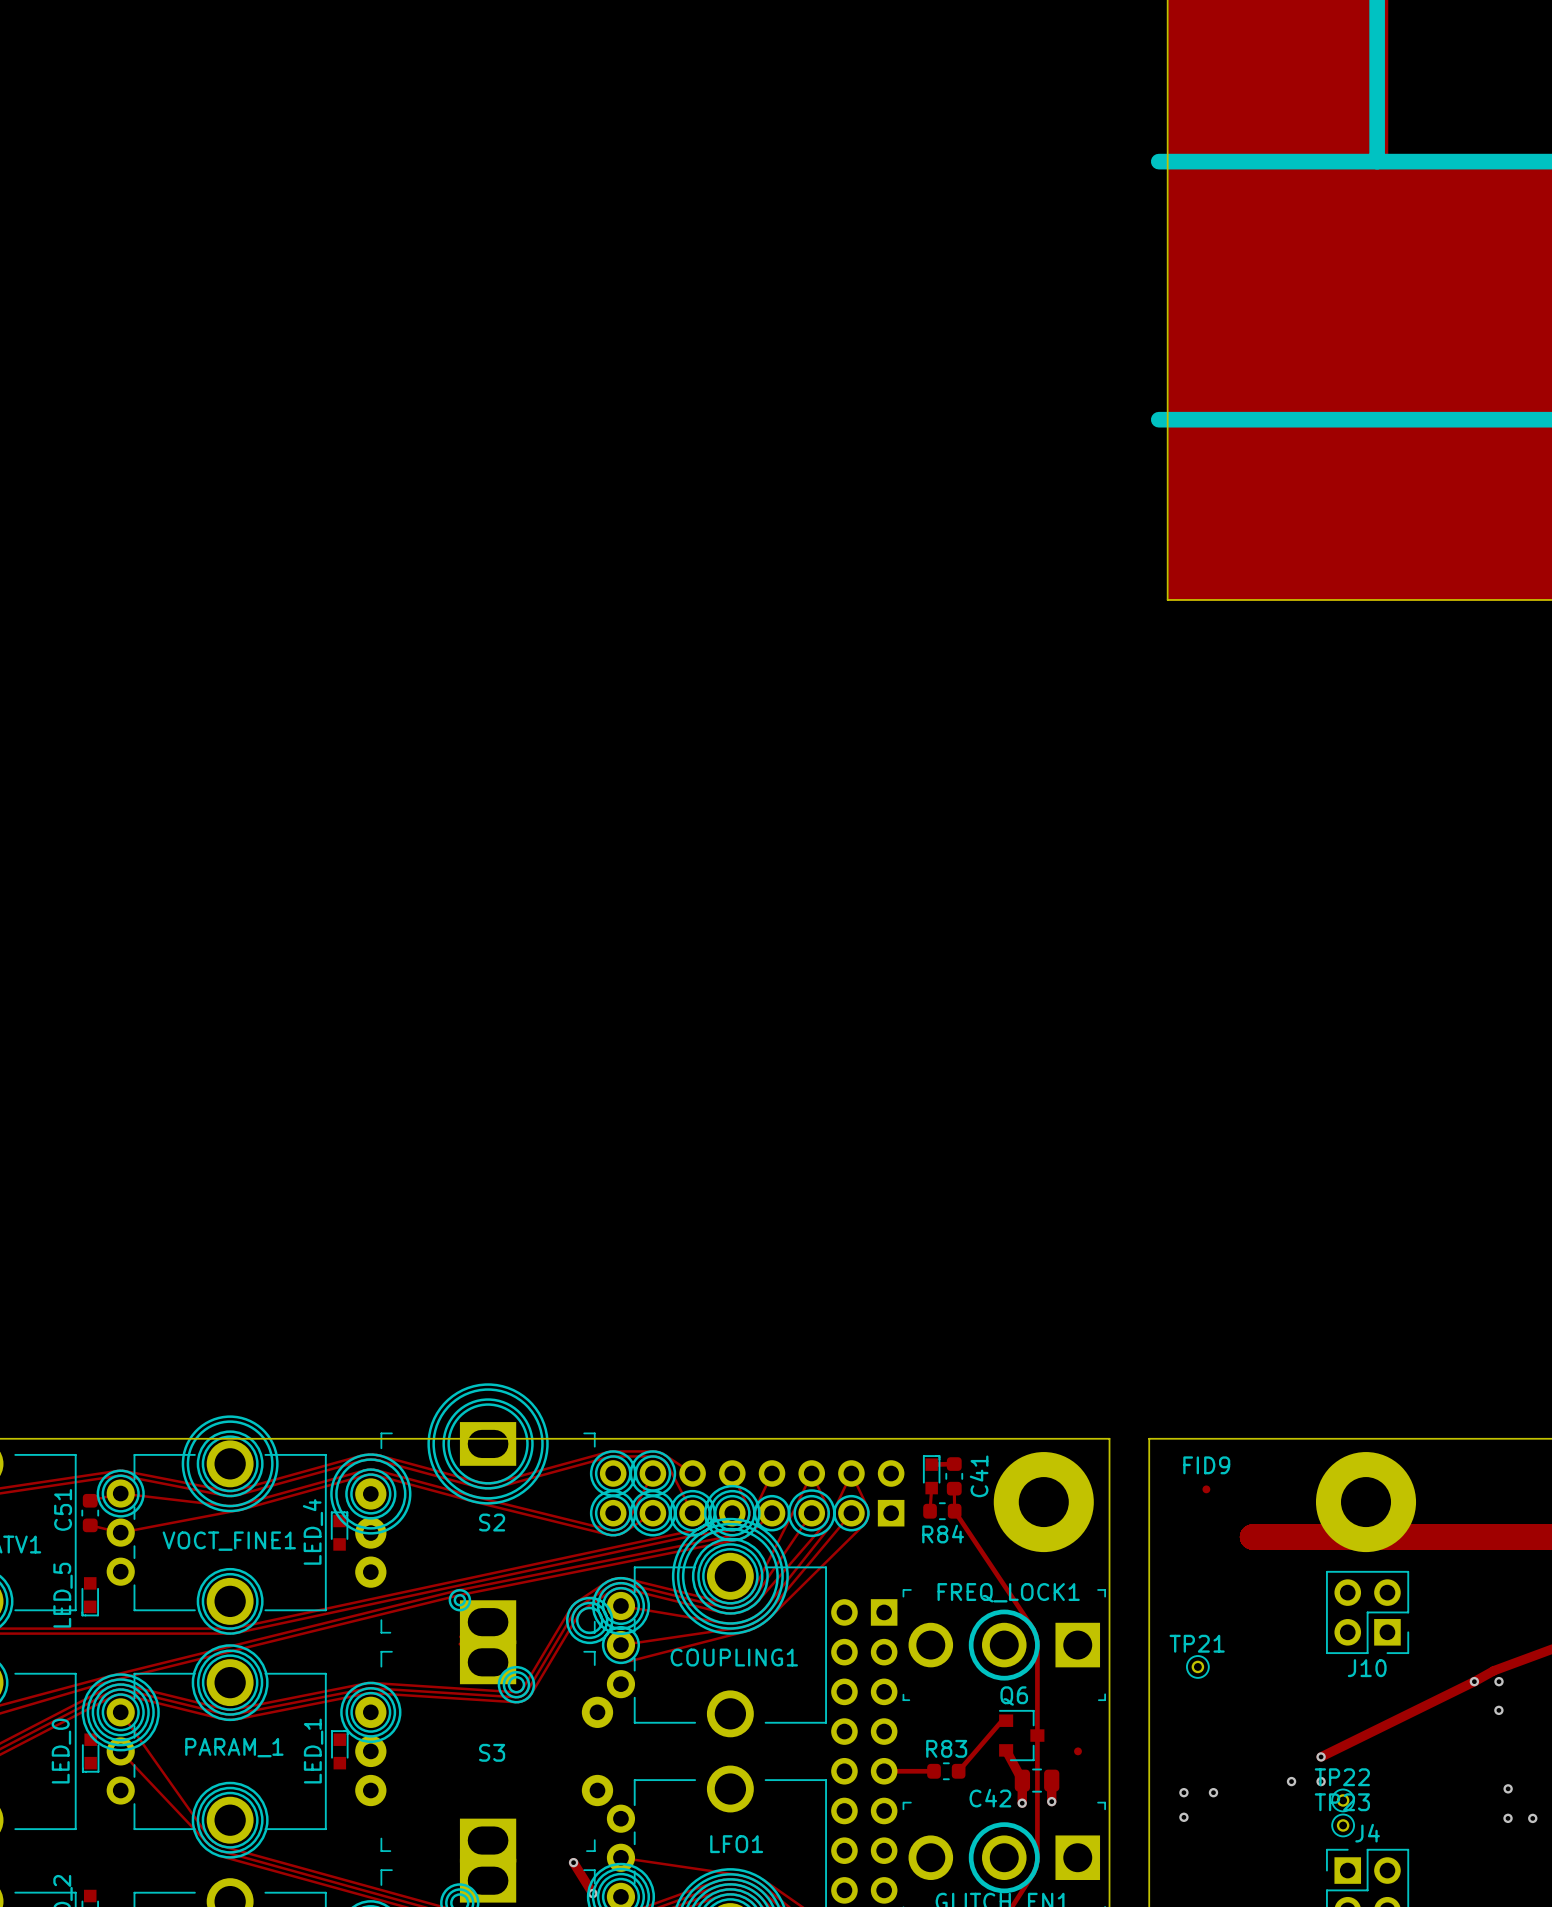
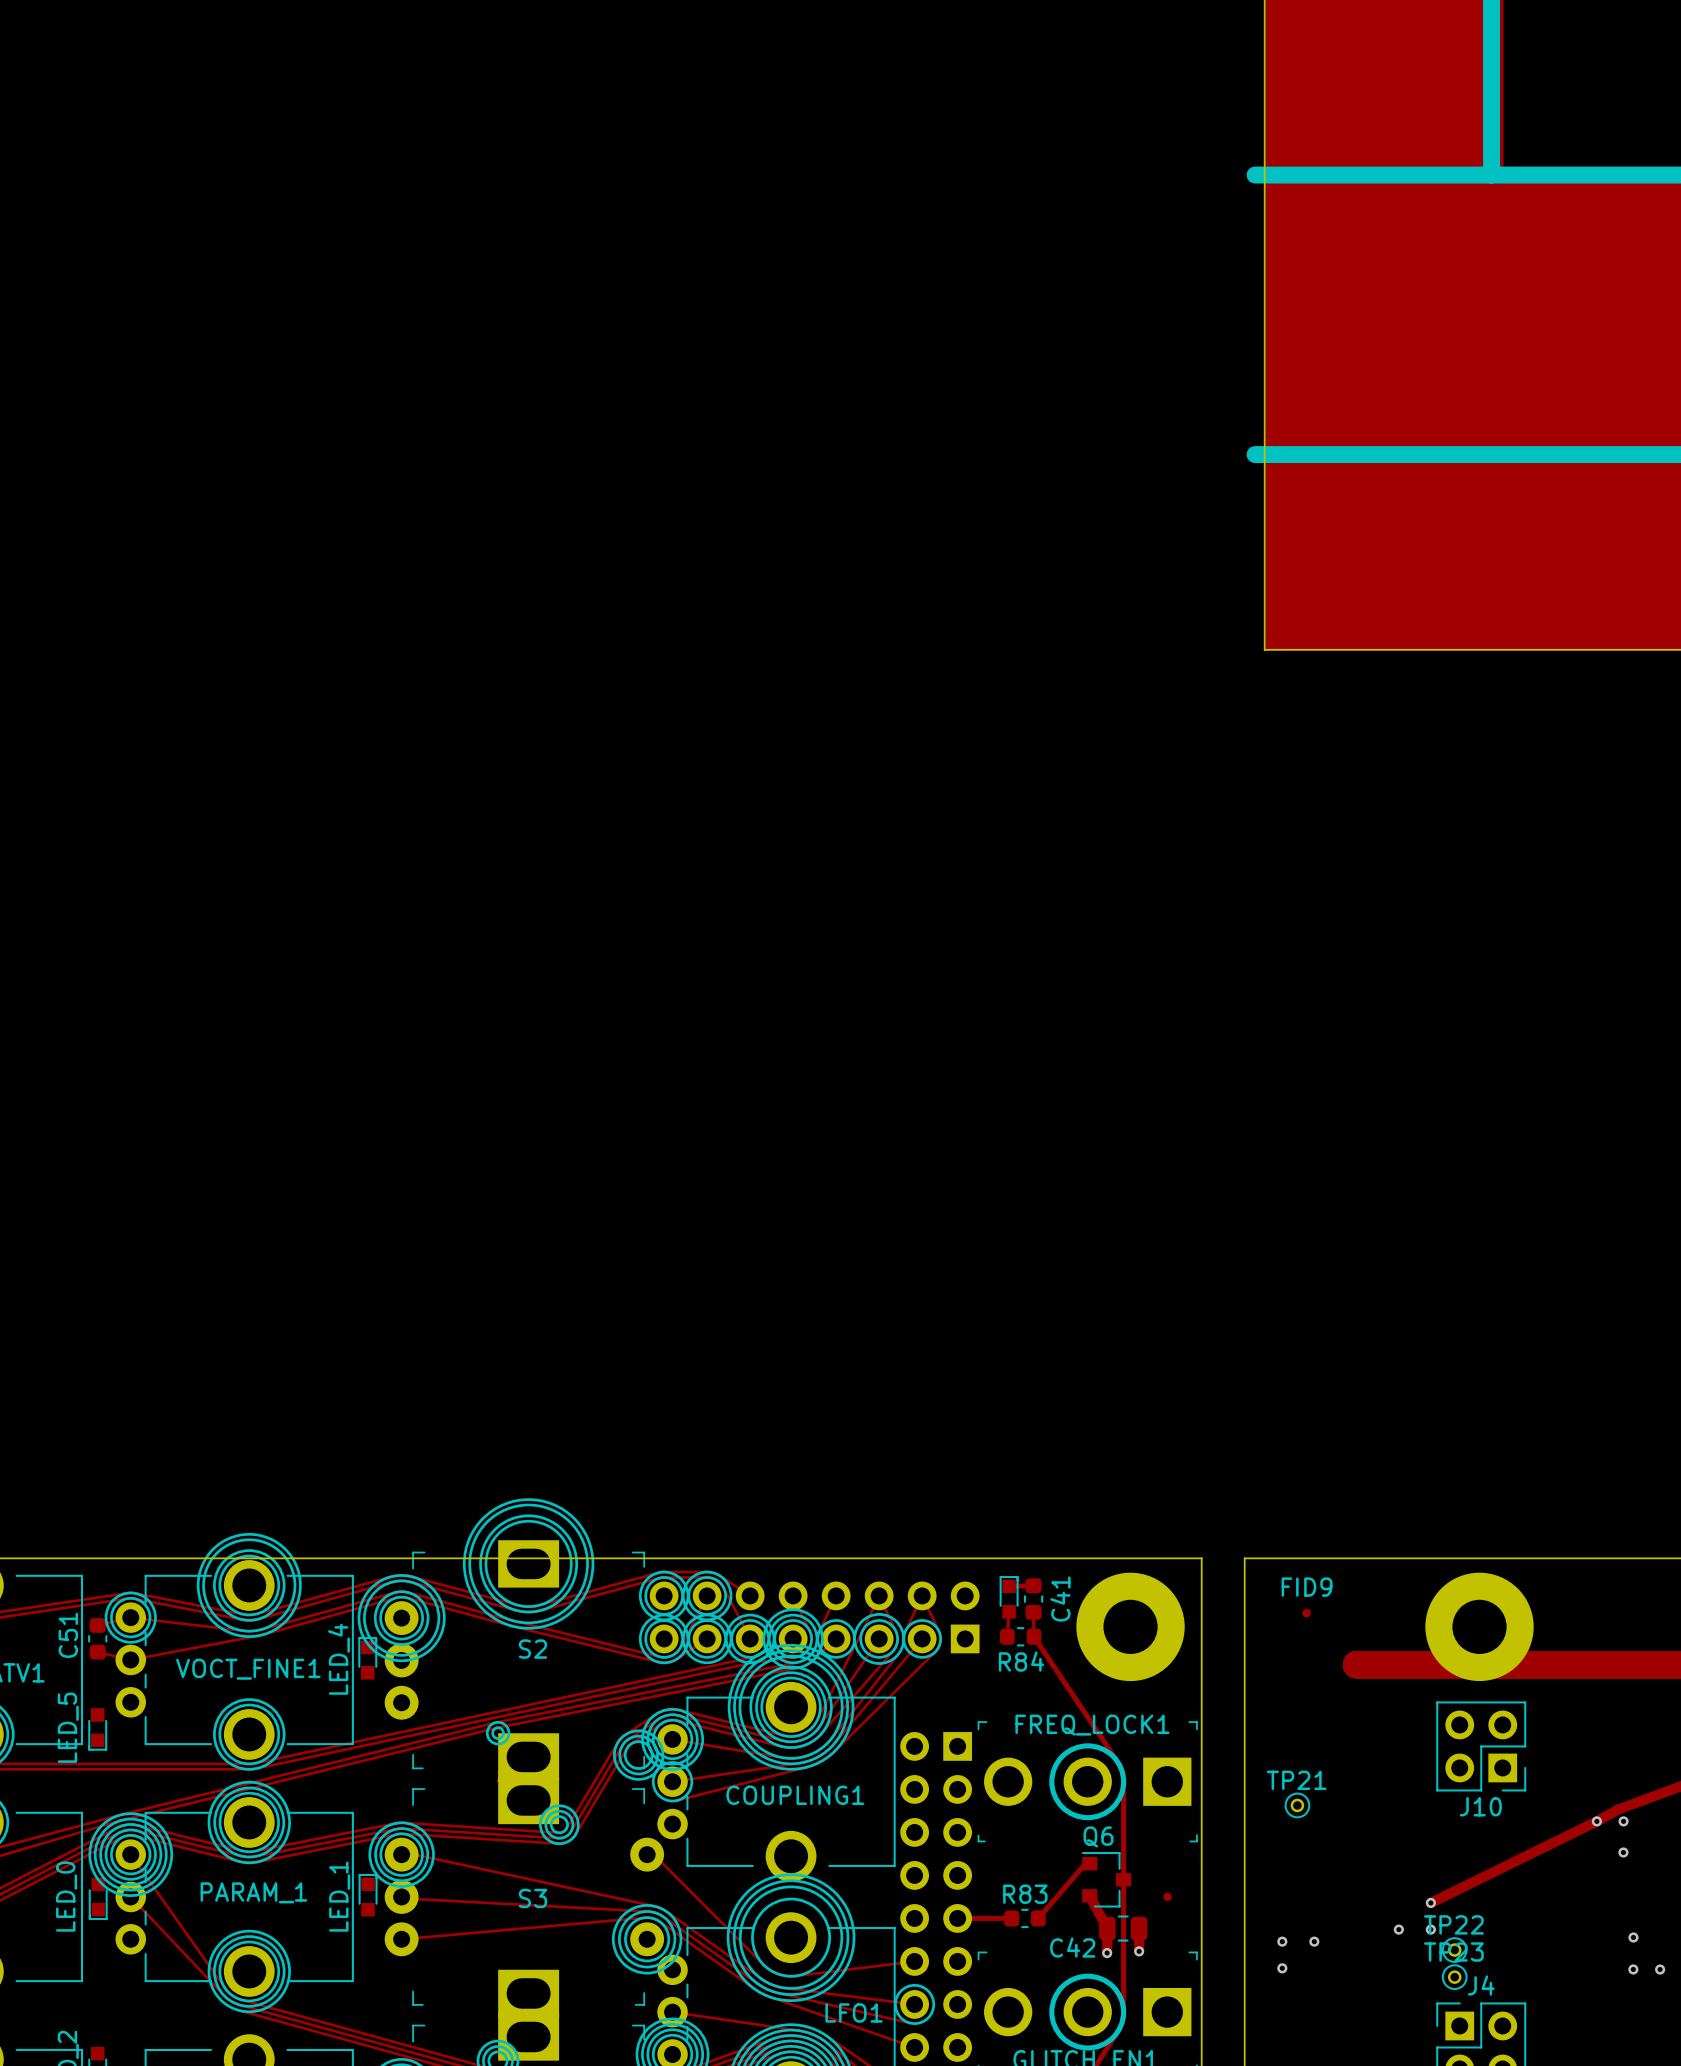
track: none -> (415, 1854) (658, 1907) (761, 1979) (774, 1985) (914, 2004)
track: none -> (653, 1854) (763, 1964) (776, 1973) (795, 1975) (914, 1961)
drawing: none -> [726, 1873, 856, 2003]
track: none -> (408, 1898) (652, 1912) (663, 1916) (767, 1989) (910, 2023)
drawing: none -> [611, 1904, 683, 1975]
track: none -> (401, 1939) (652, 1918) (764, 1994) (914, 2047)
drawing: none -> [894, 1983, 936, 2025]
LFO1 name position: LFO1 (736, 1844) -> LFO1 (854, 2012)
track: (573, 1862) (592, 1893) -> none
via: (573, 1862) -> none
via: (592, 1893) -> none

